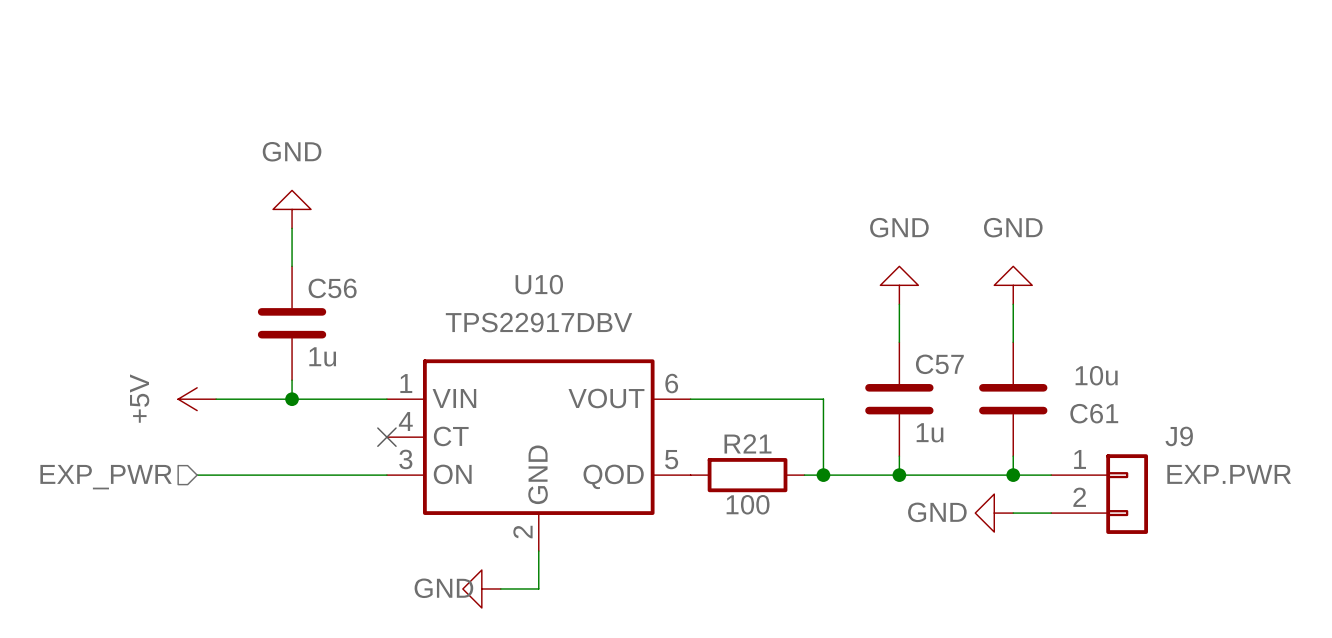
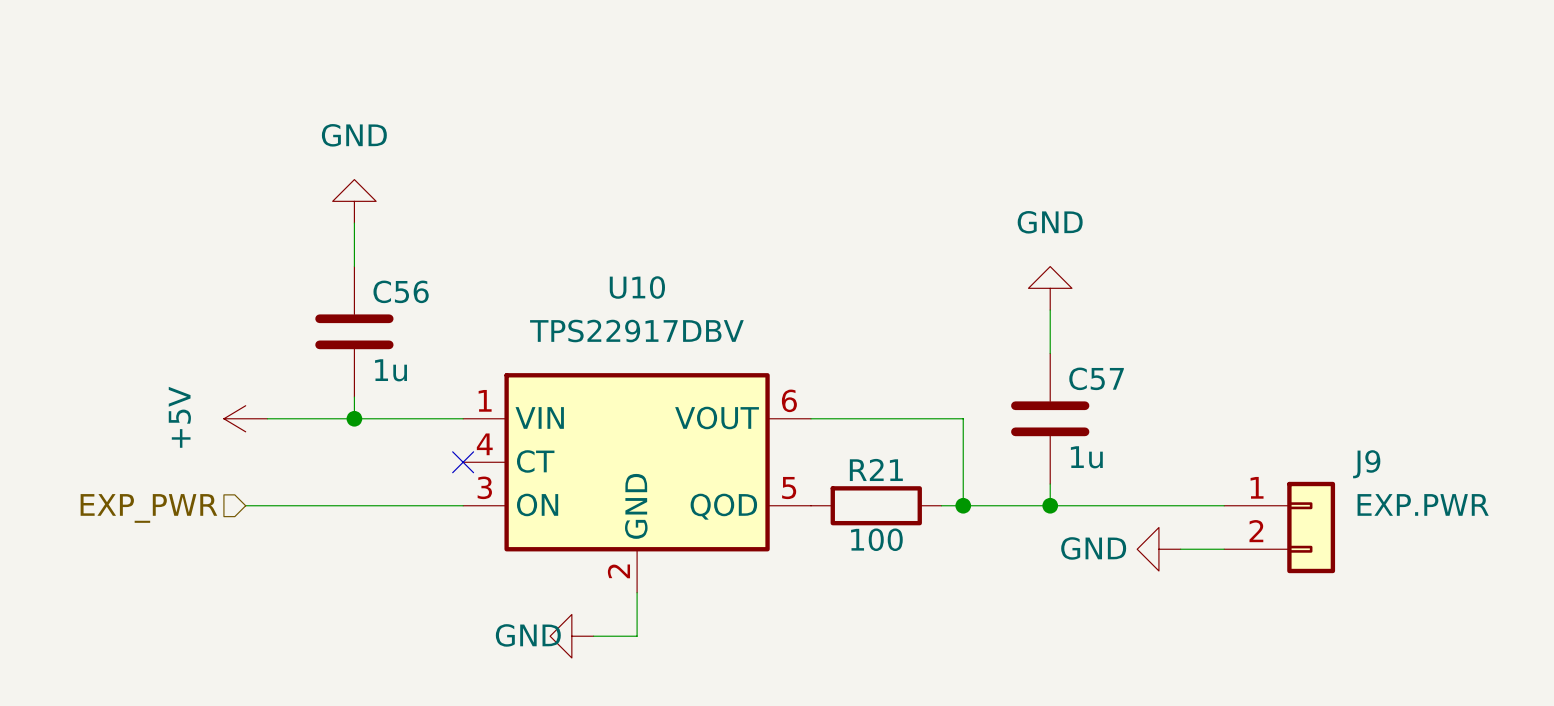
power symbol: GND (1013, 285) -> none
wire: (1013, 304) (1013, 342) -> none
C61: 10u (1013, 399) -> none
wire: (1013, 456) (1013, 475) -> none
junction: (1013, 475) -> none

